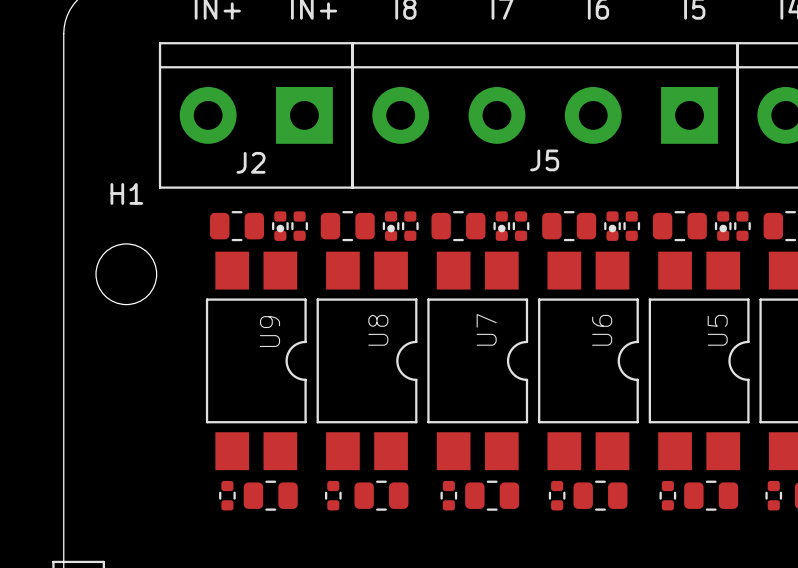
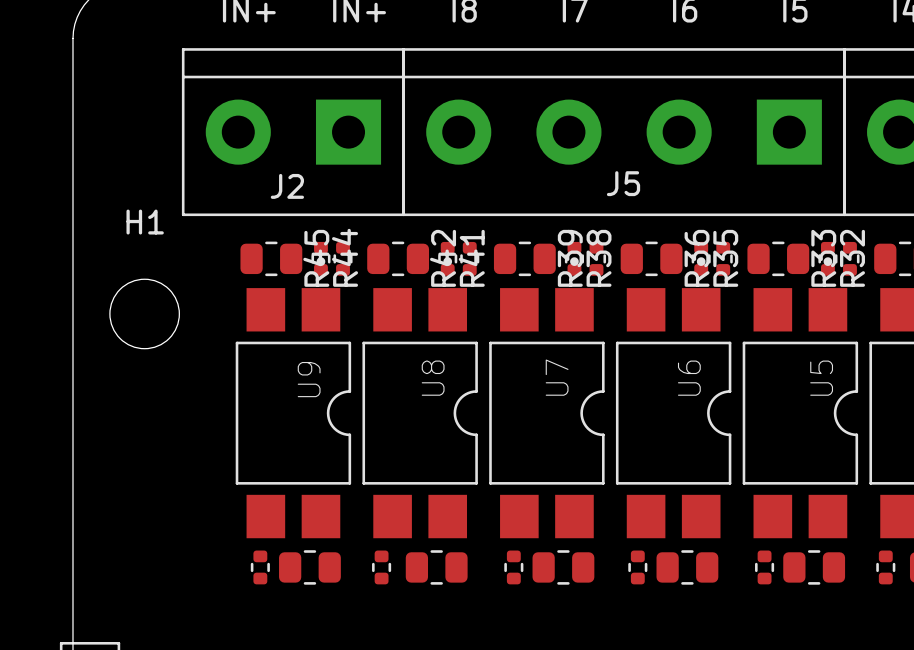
R45 name: none -> R45 (316, 258)
R44 name: none -> R44 (345, 257)
R42 name: none -> R42 (443, 258)
R41 name: none -> R41 (471, 258)
R39 name: none -> R39 (570, 258)
R38 name: none -> R38 (599, 258)
R36 name: none -> R36 (697, 258)
R35 name: none -> R35 (725, 258)
R33 name: none -> R33 (823, 258)
R32 name: none -> R32 (852, 258)

